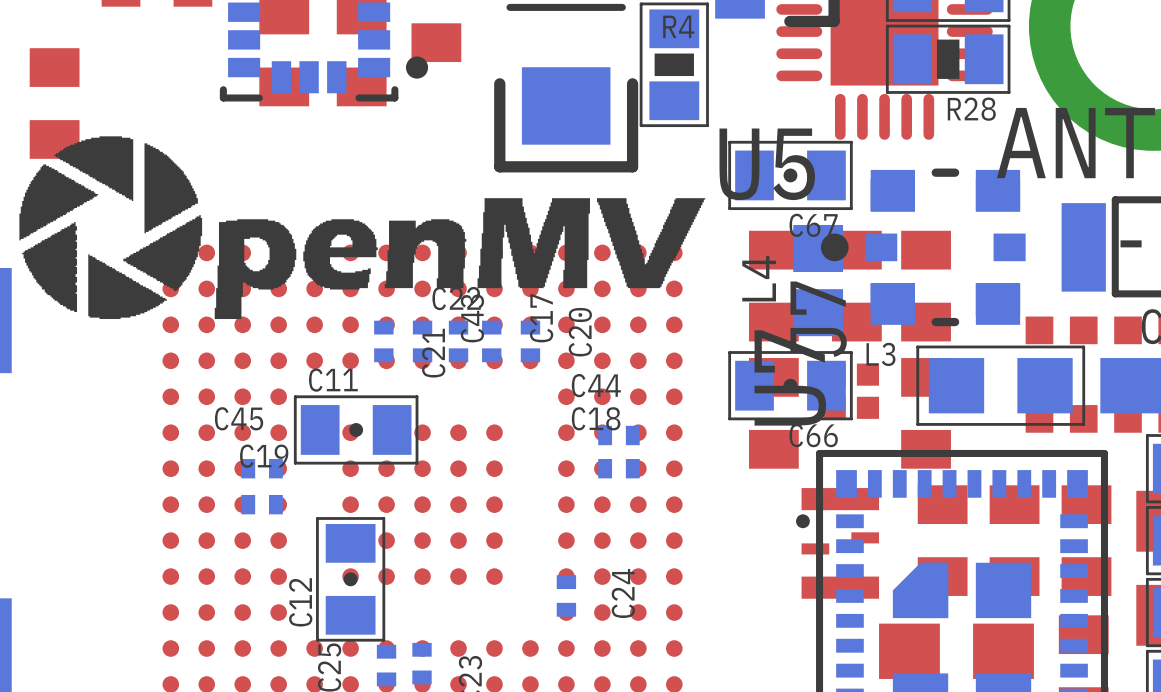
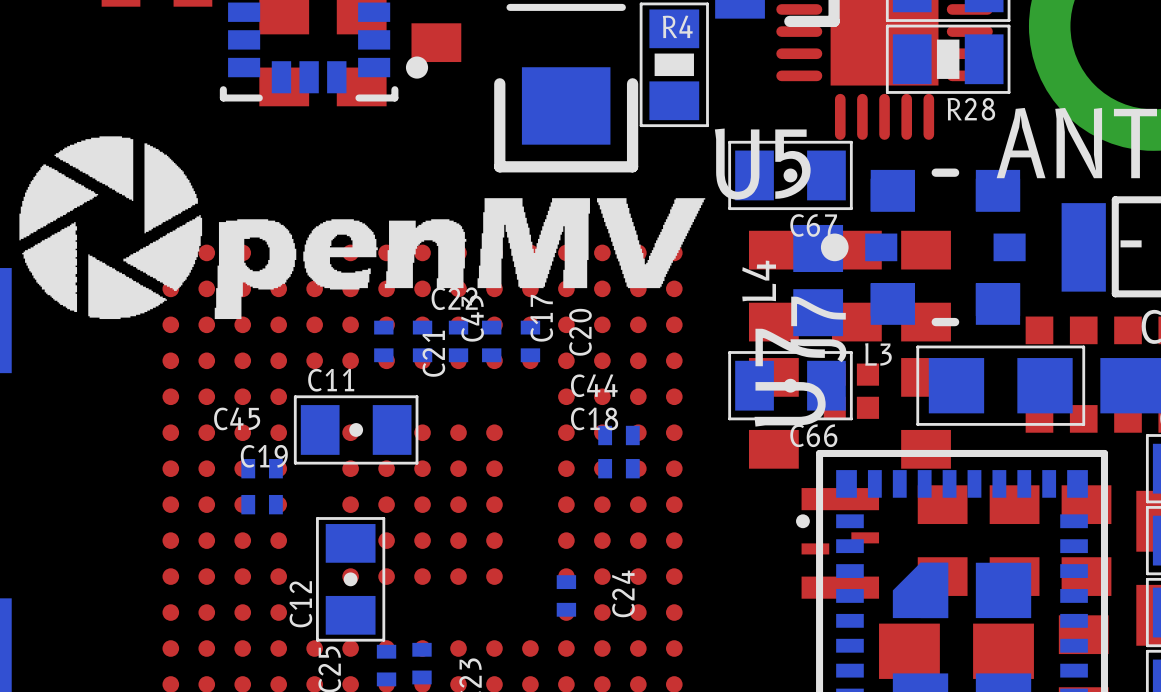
part: (54, 103) -> none

